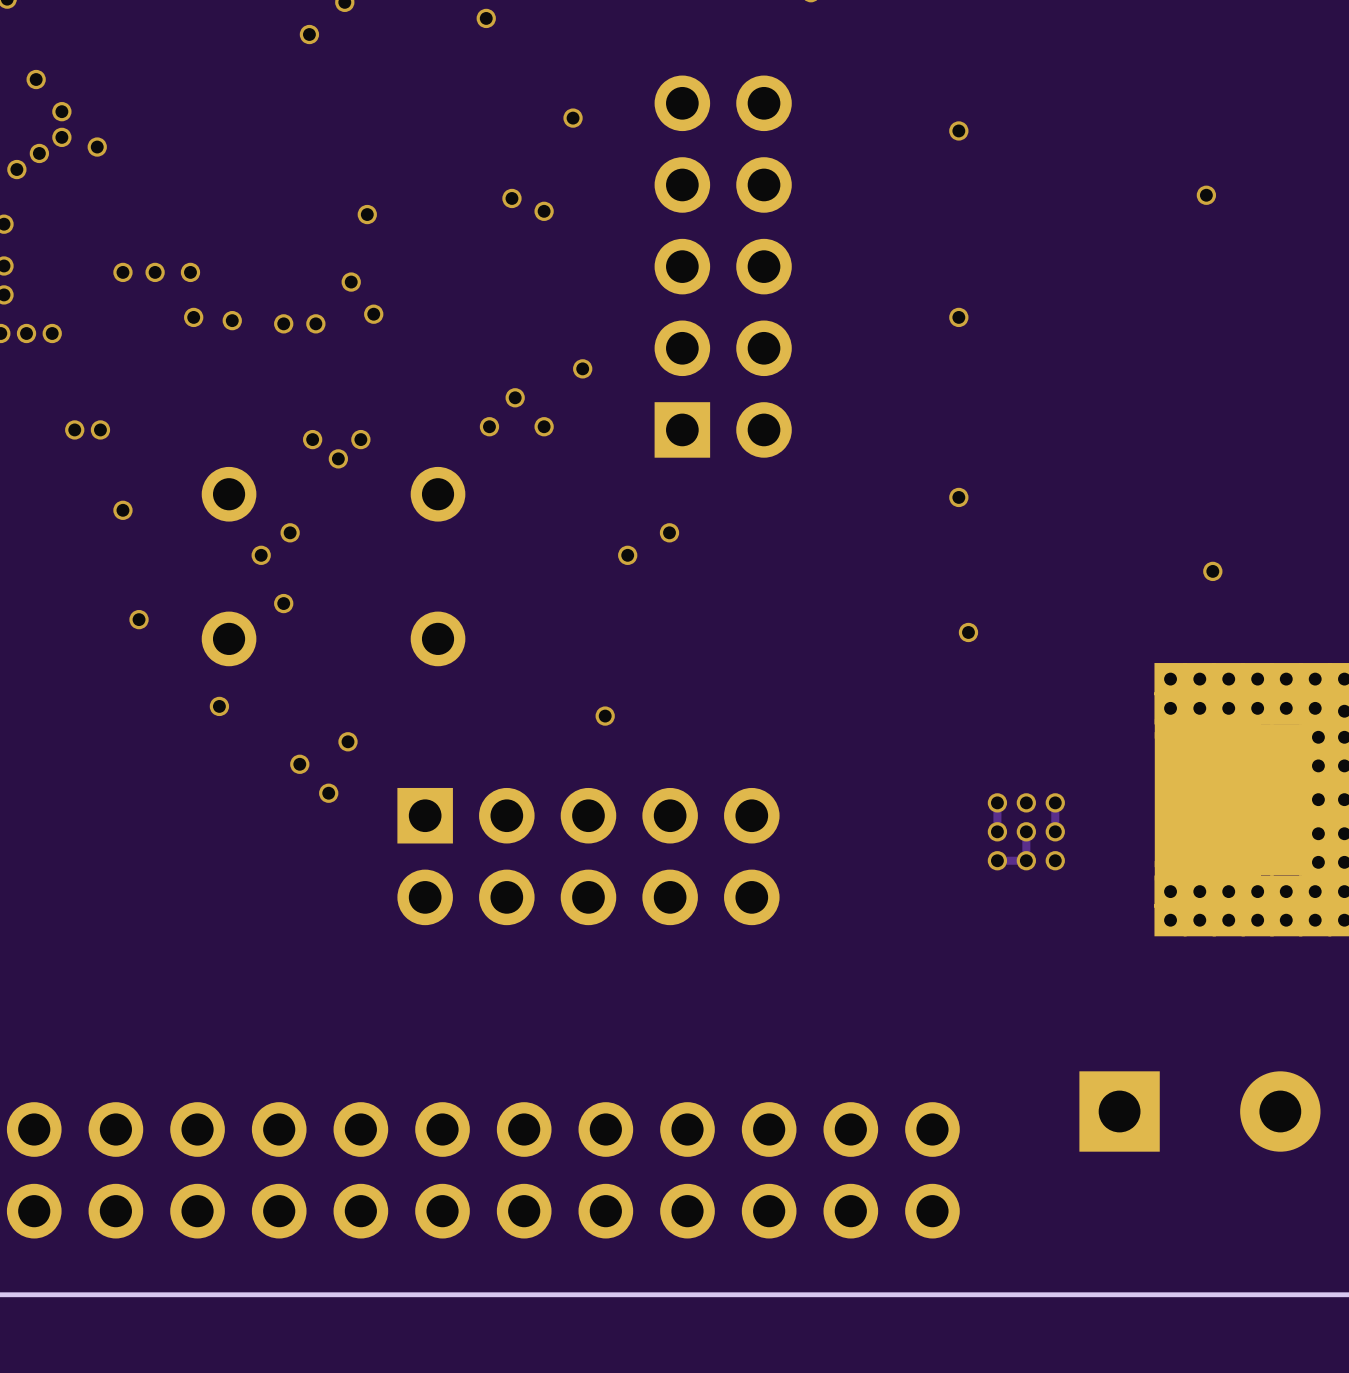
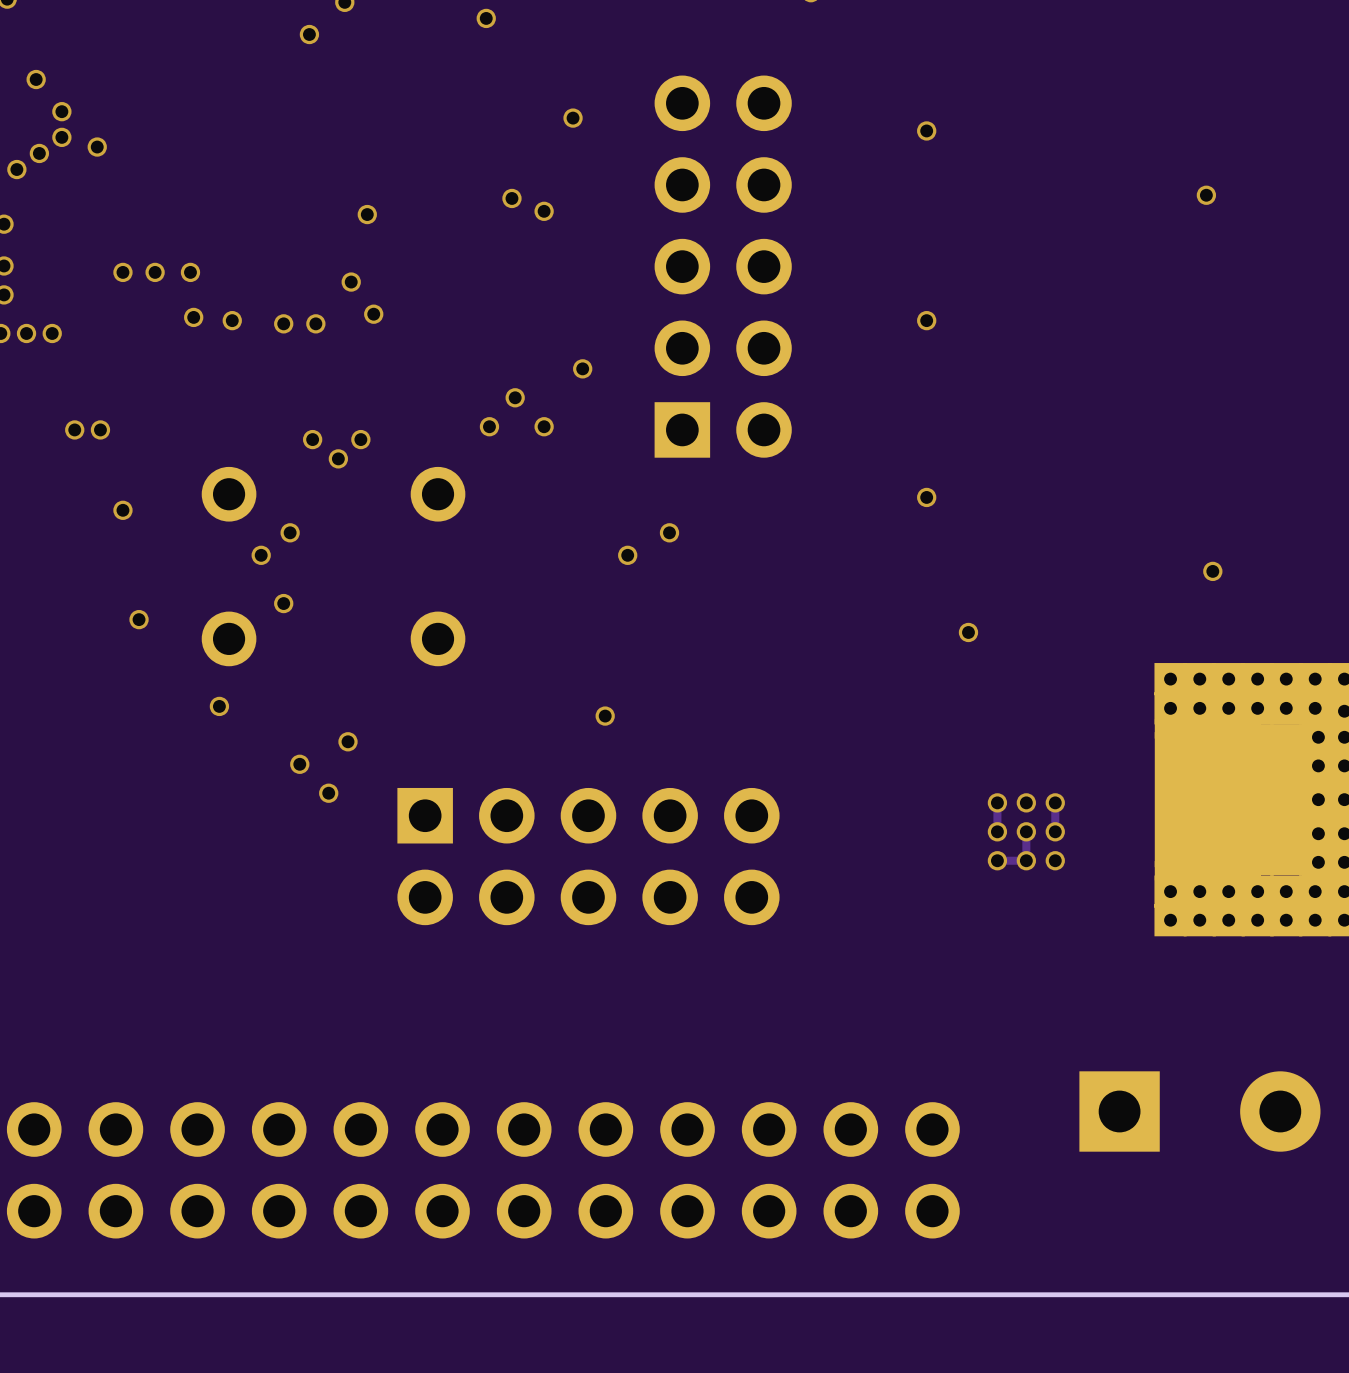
via position: (958, 130) -> (926, 130)
via position: (958, 317) -> (926, 320)
via position: (958, 497) -> (926, 497)

